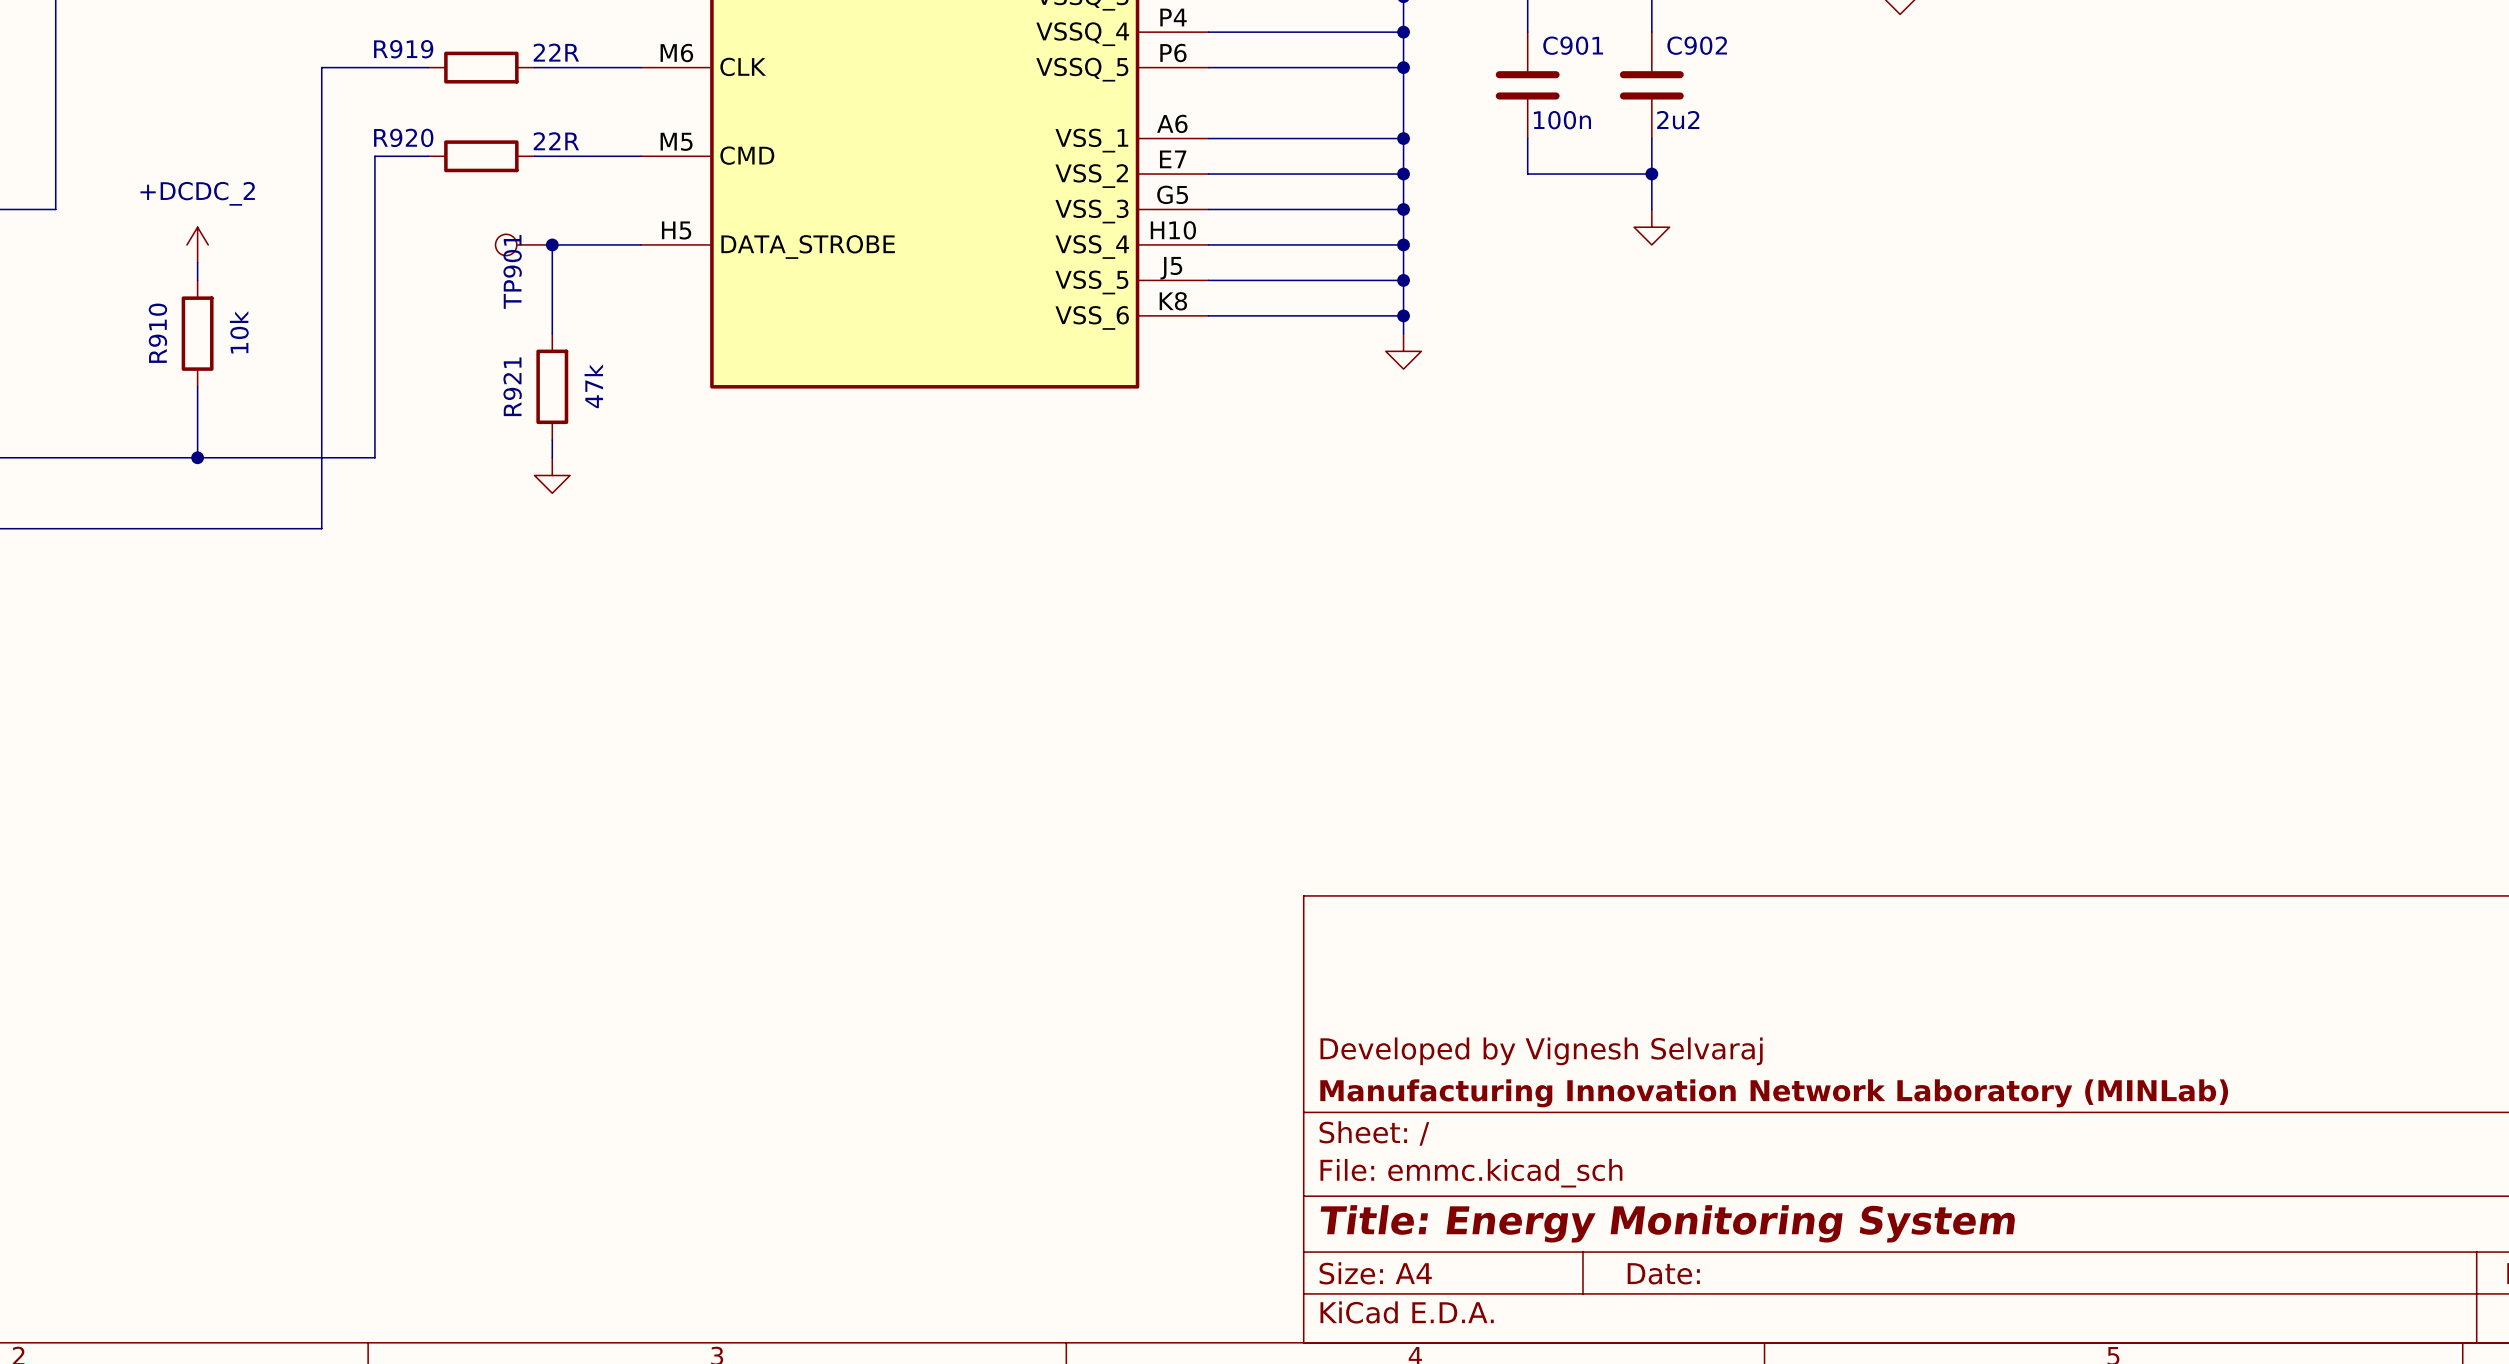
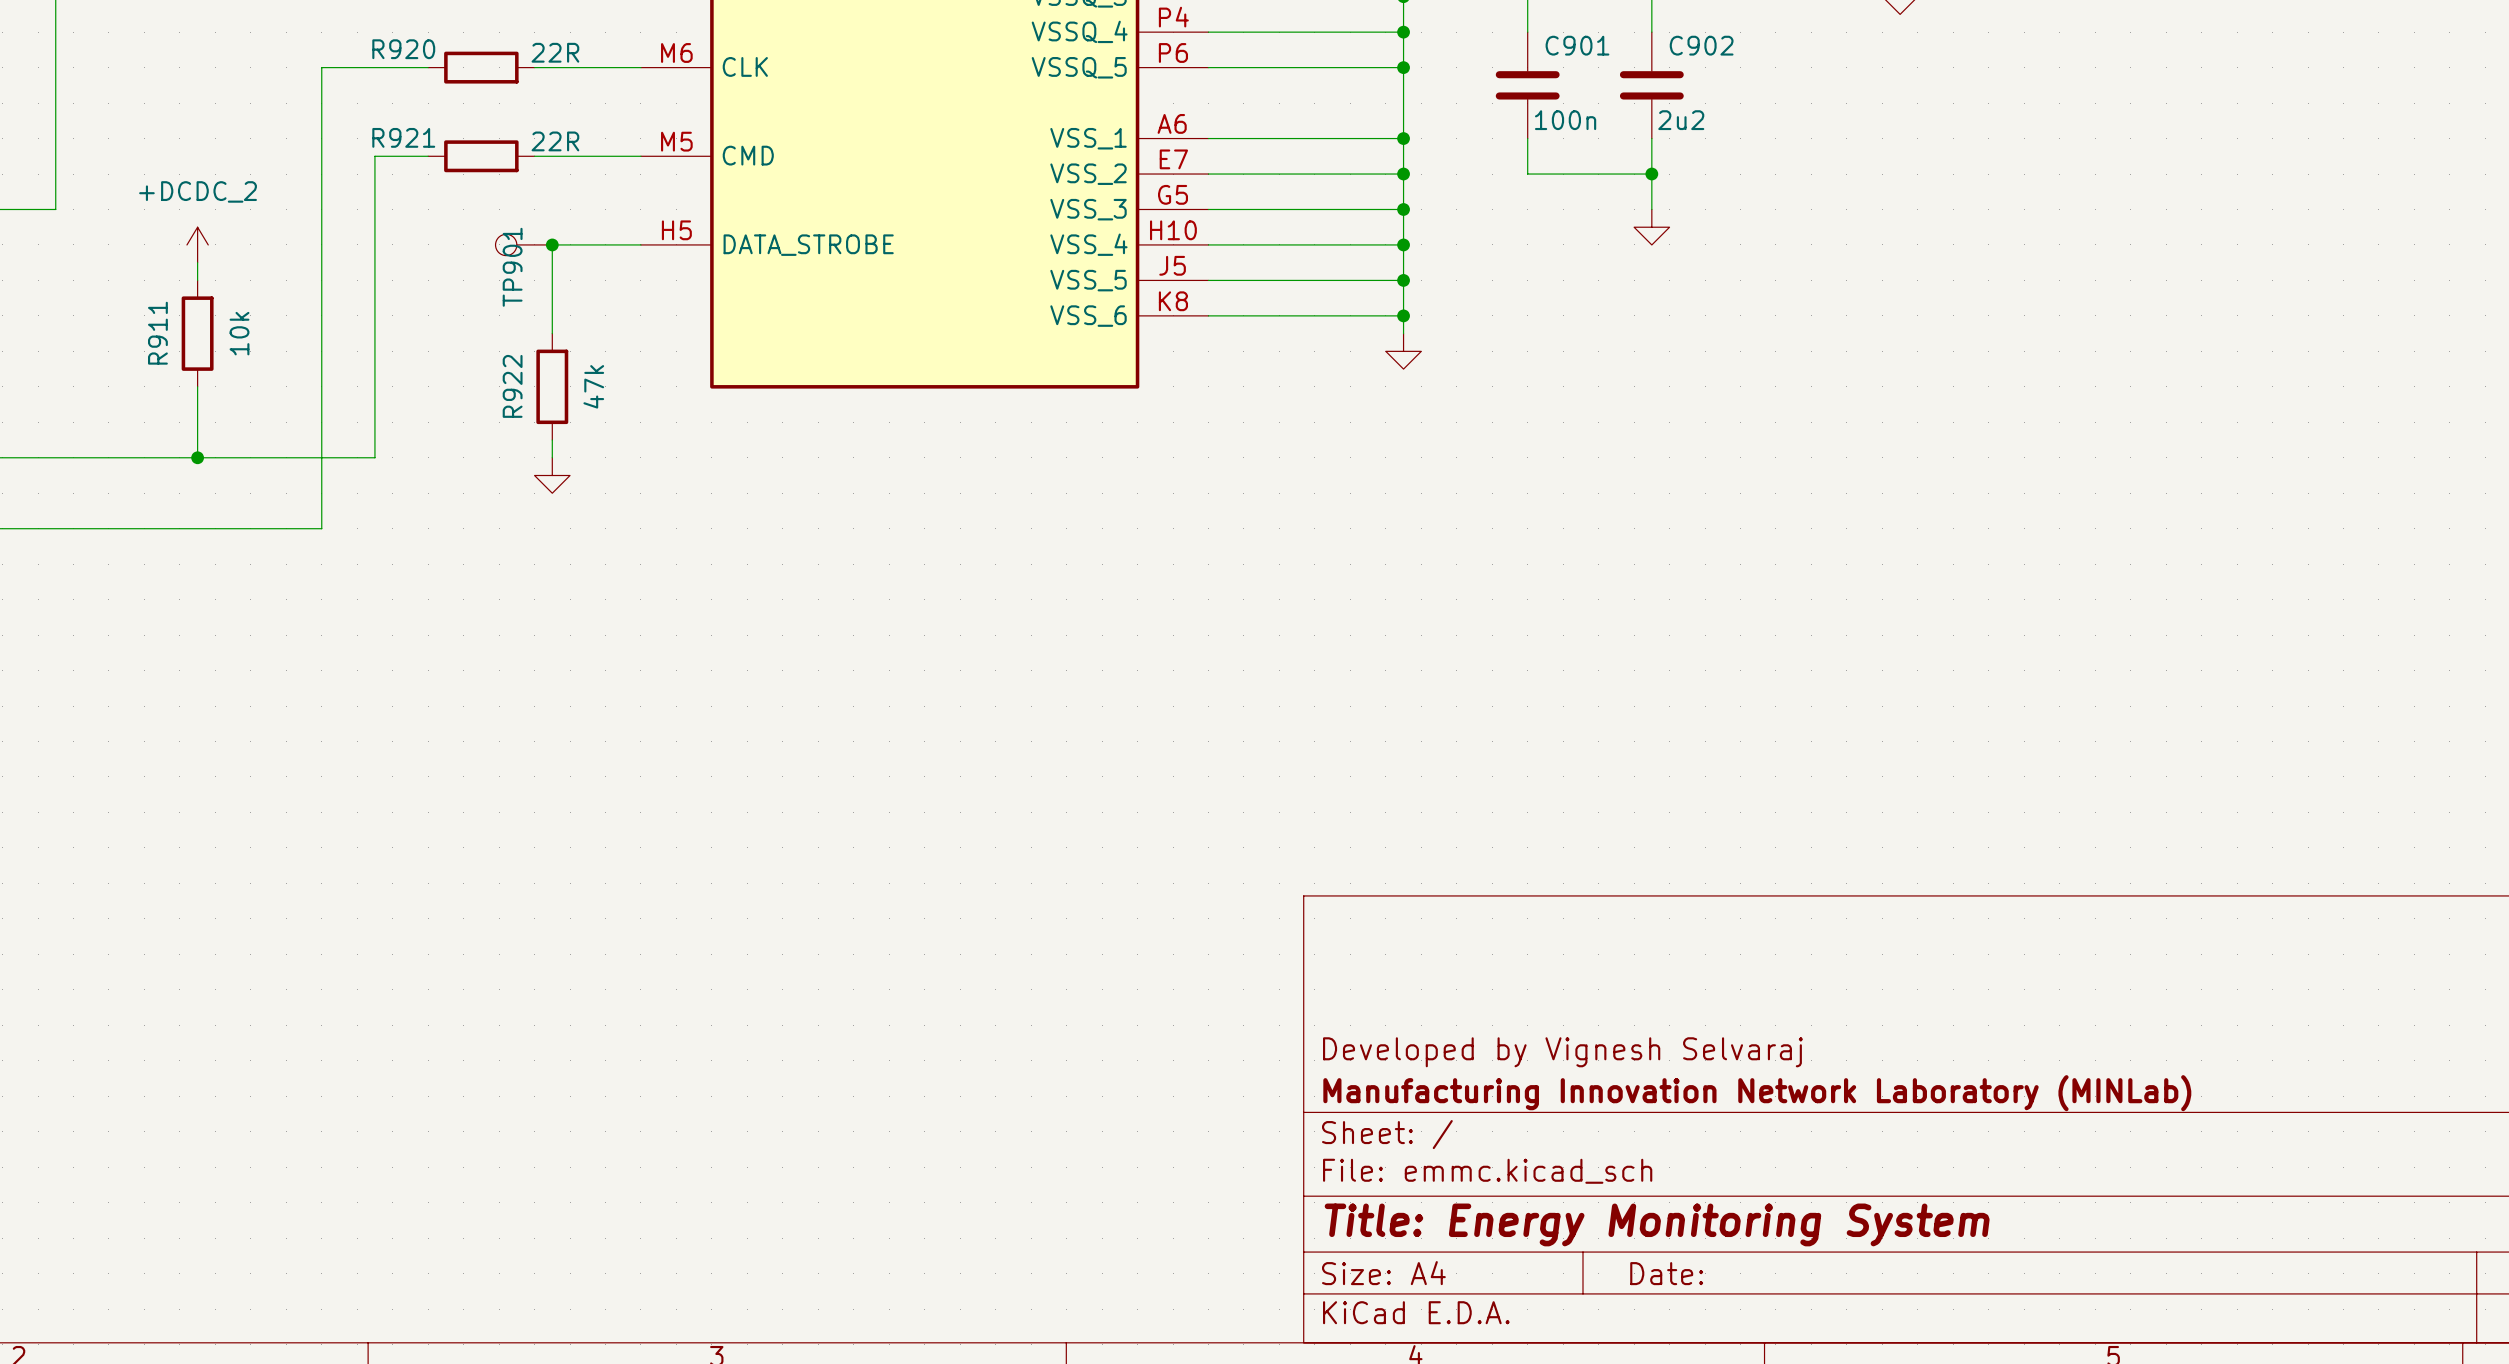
R919 name: R919 (403, 49) -> R920 (403, 49)
R920 name: R920 (403, 137) -> R921 (403, 137)
R910 name: R910 (157, 333) -> R911 (157, 333)
R921 name: R921 (512, 386) -> R922 (512, 386)

